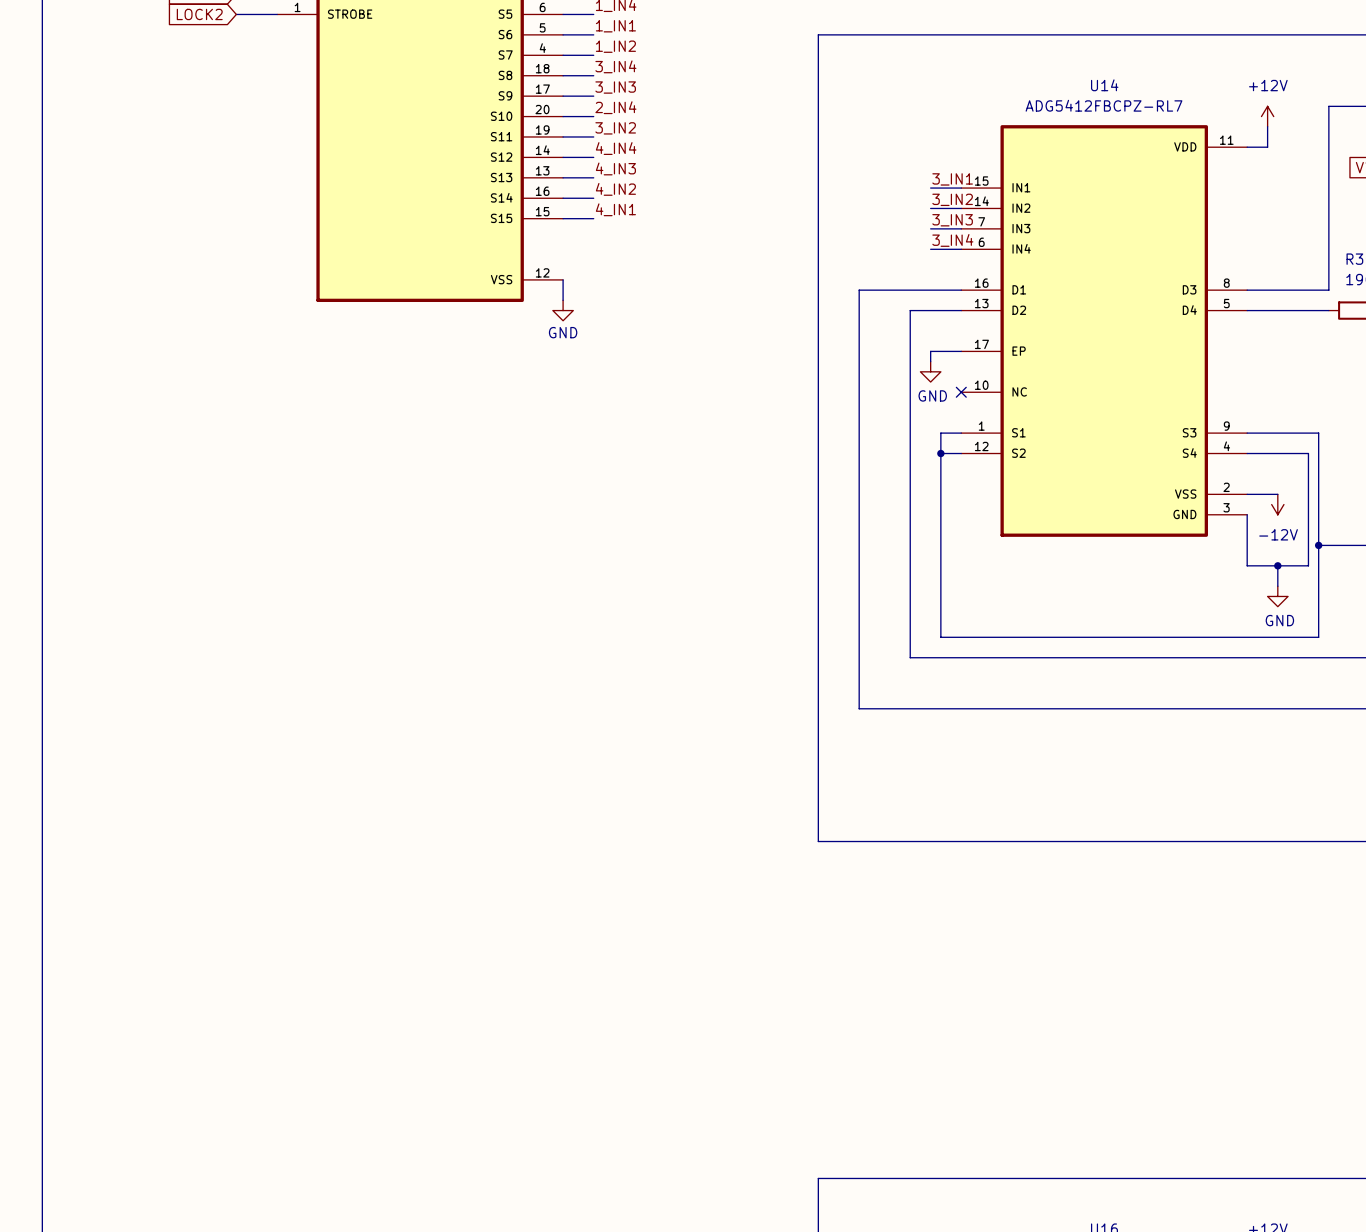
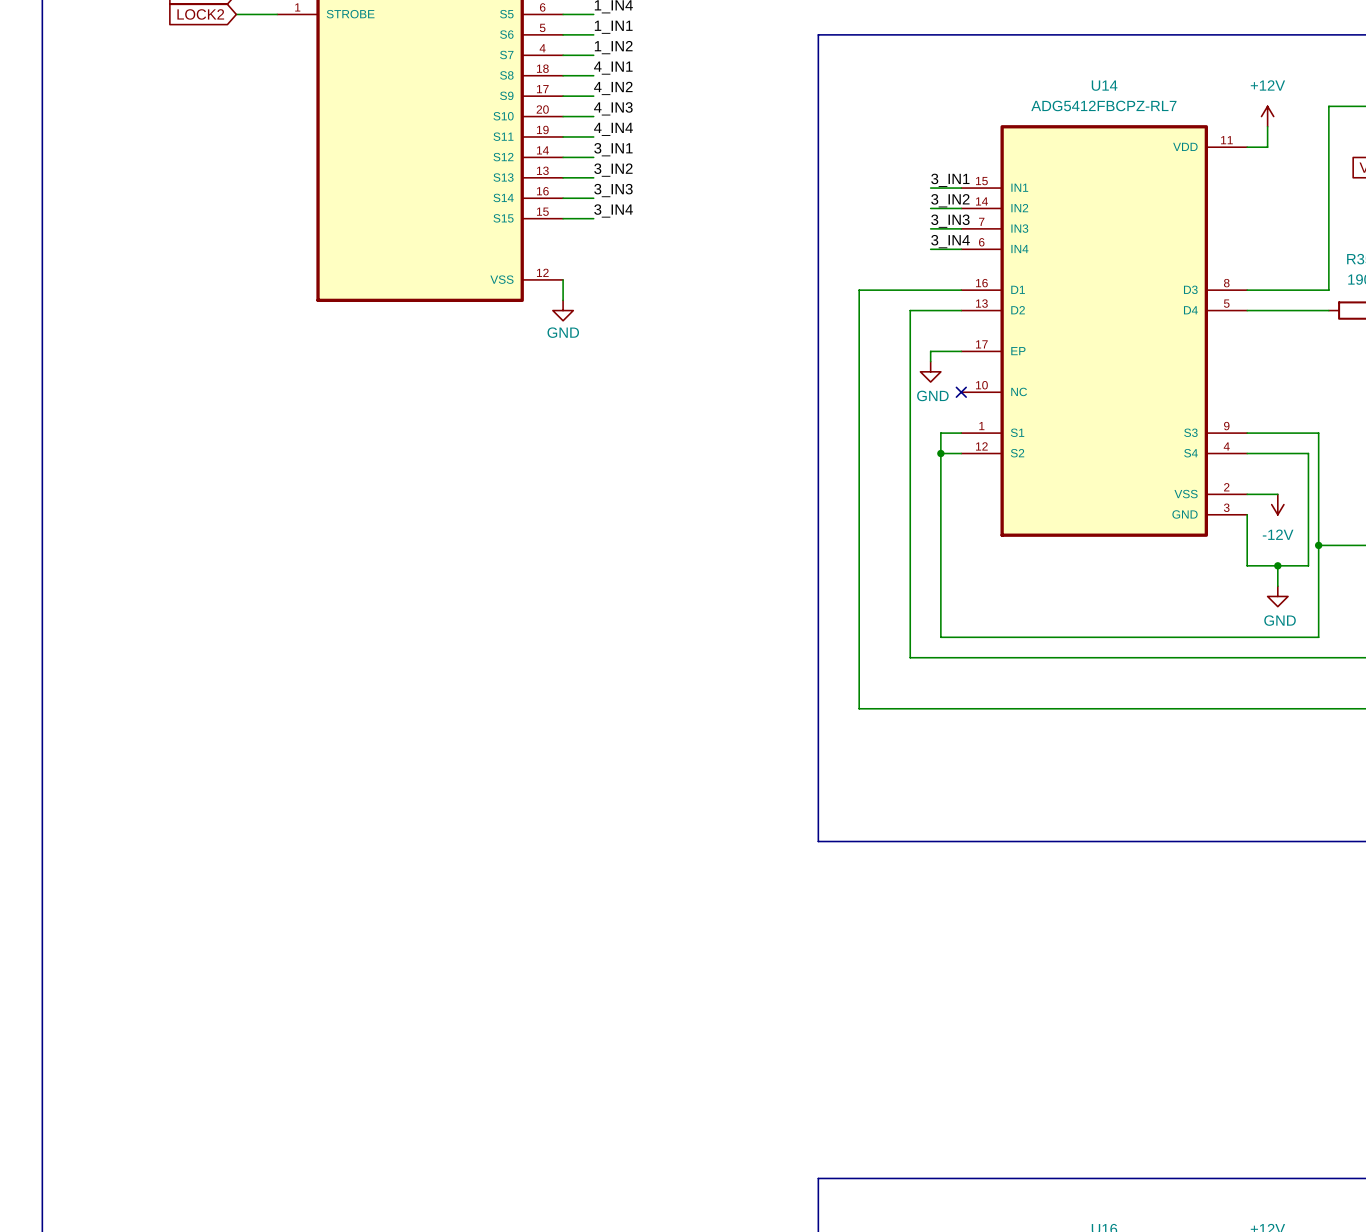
label: 3_IN4 (615, 66) -> 4_IN1 (613, 68)
label: 3_IN3 (615, 87) -> 4_IN2 (613, 88)
label: 2_IN4 (615, 107) -> 4_IN3 (613, 108)
label: 3_IN2 (615, 128) -> 4_IN4 (613, 129)
label: 4_IN4 (616, 148) -> 3_IN1 (613, 149)
label: 4_IN3 (615, 168) -> 3_IN2 (613, 170)
label: 4_IN2 (615, 189) -> 3_IN3 (613, 190)
label: 4_IN1 (615, 209) -> 3_IN4 (613, 210)

